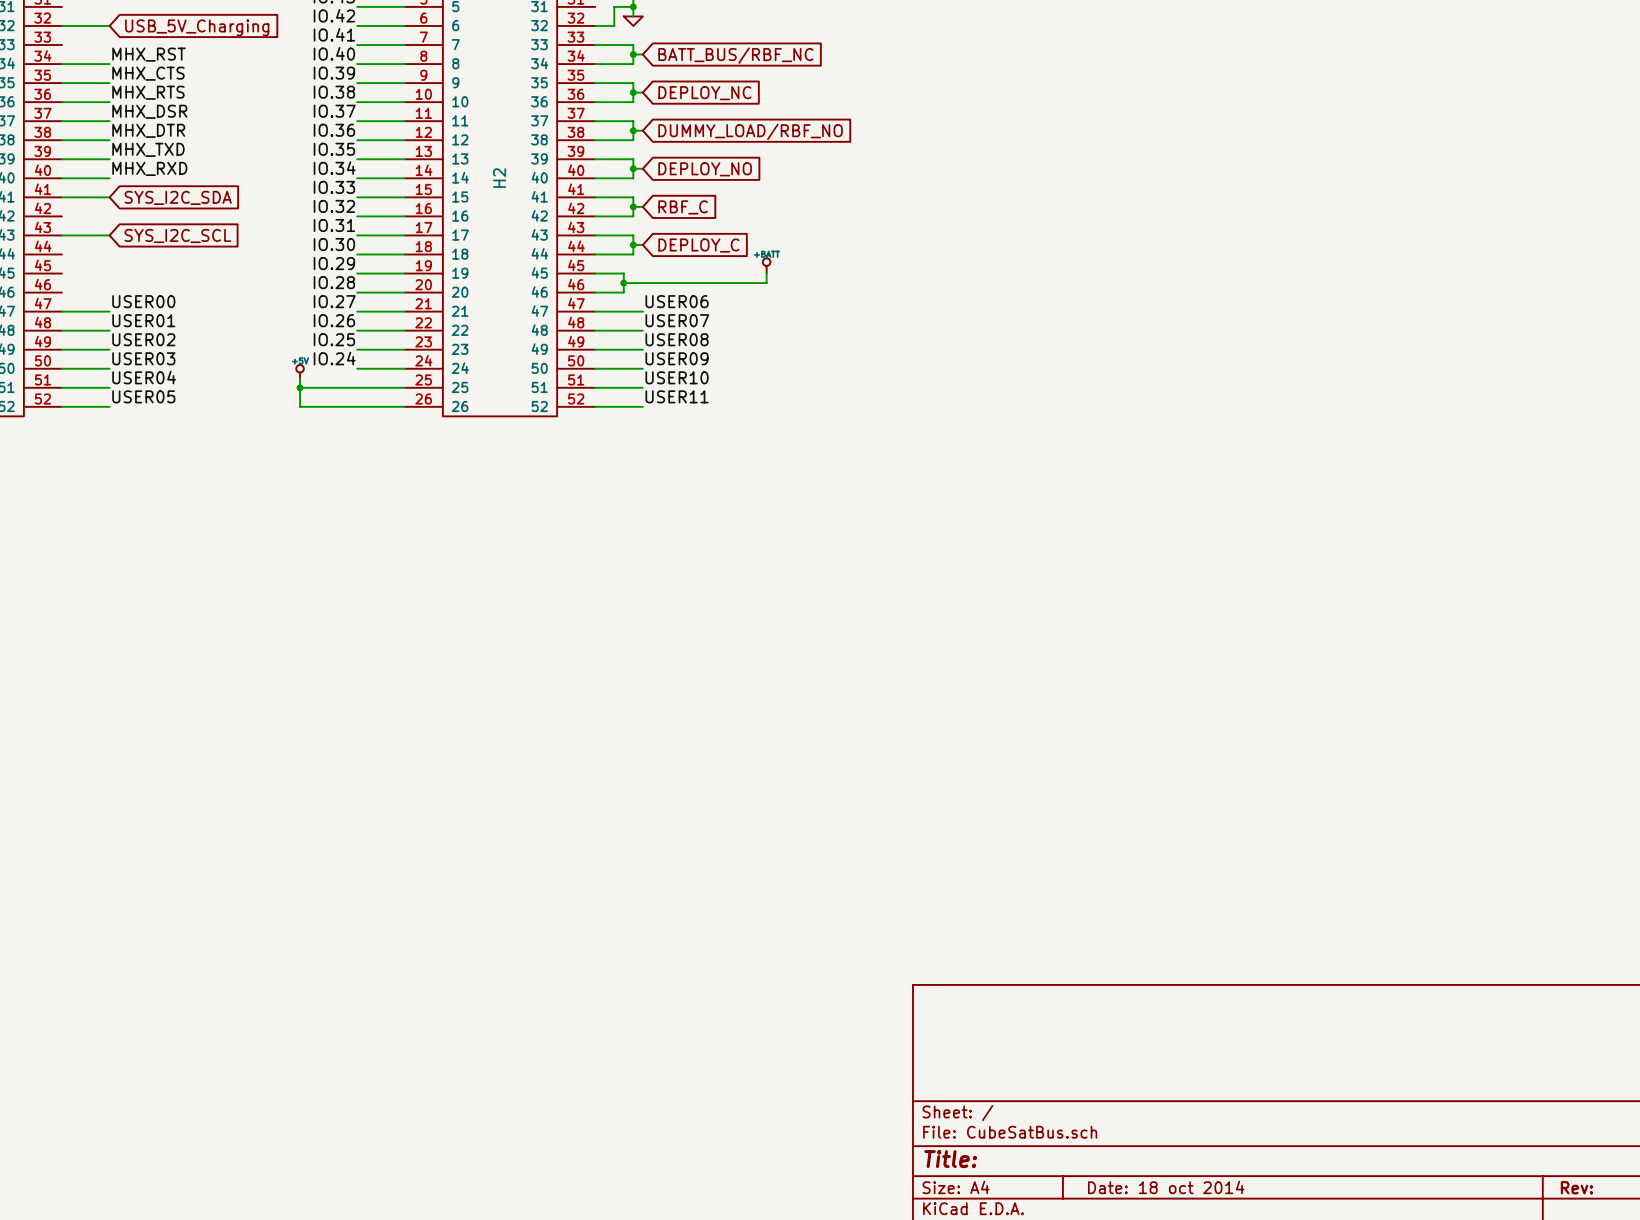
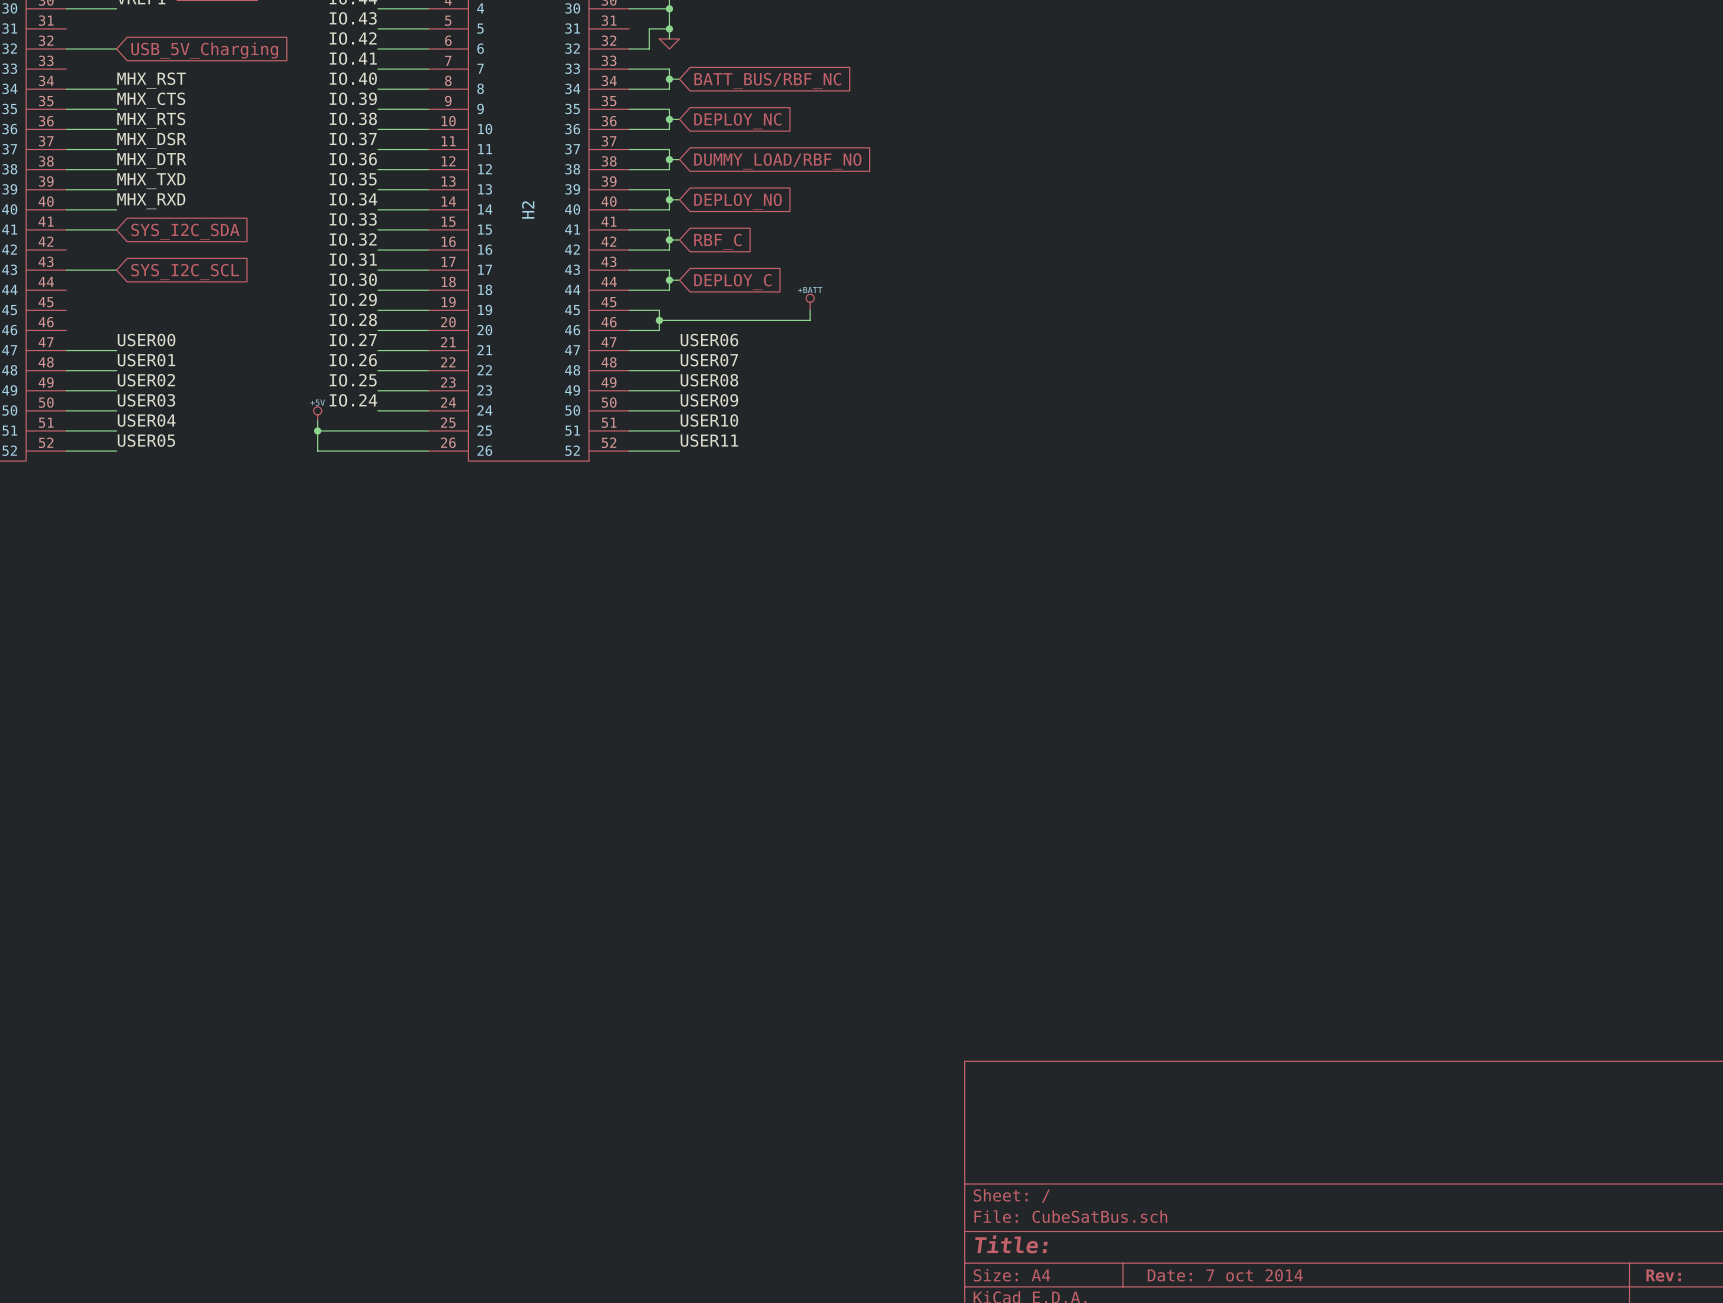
title block: Date: 18 oct 2014 (1166, 1187) -> Date: 7 oct 2014 (1225, 1275)

